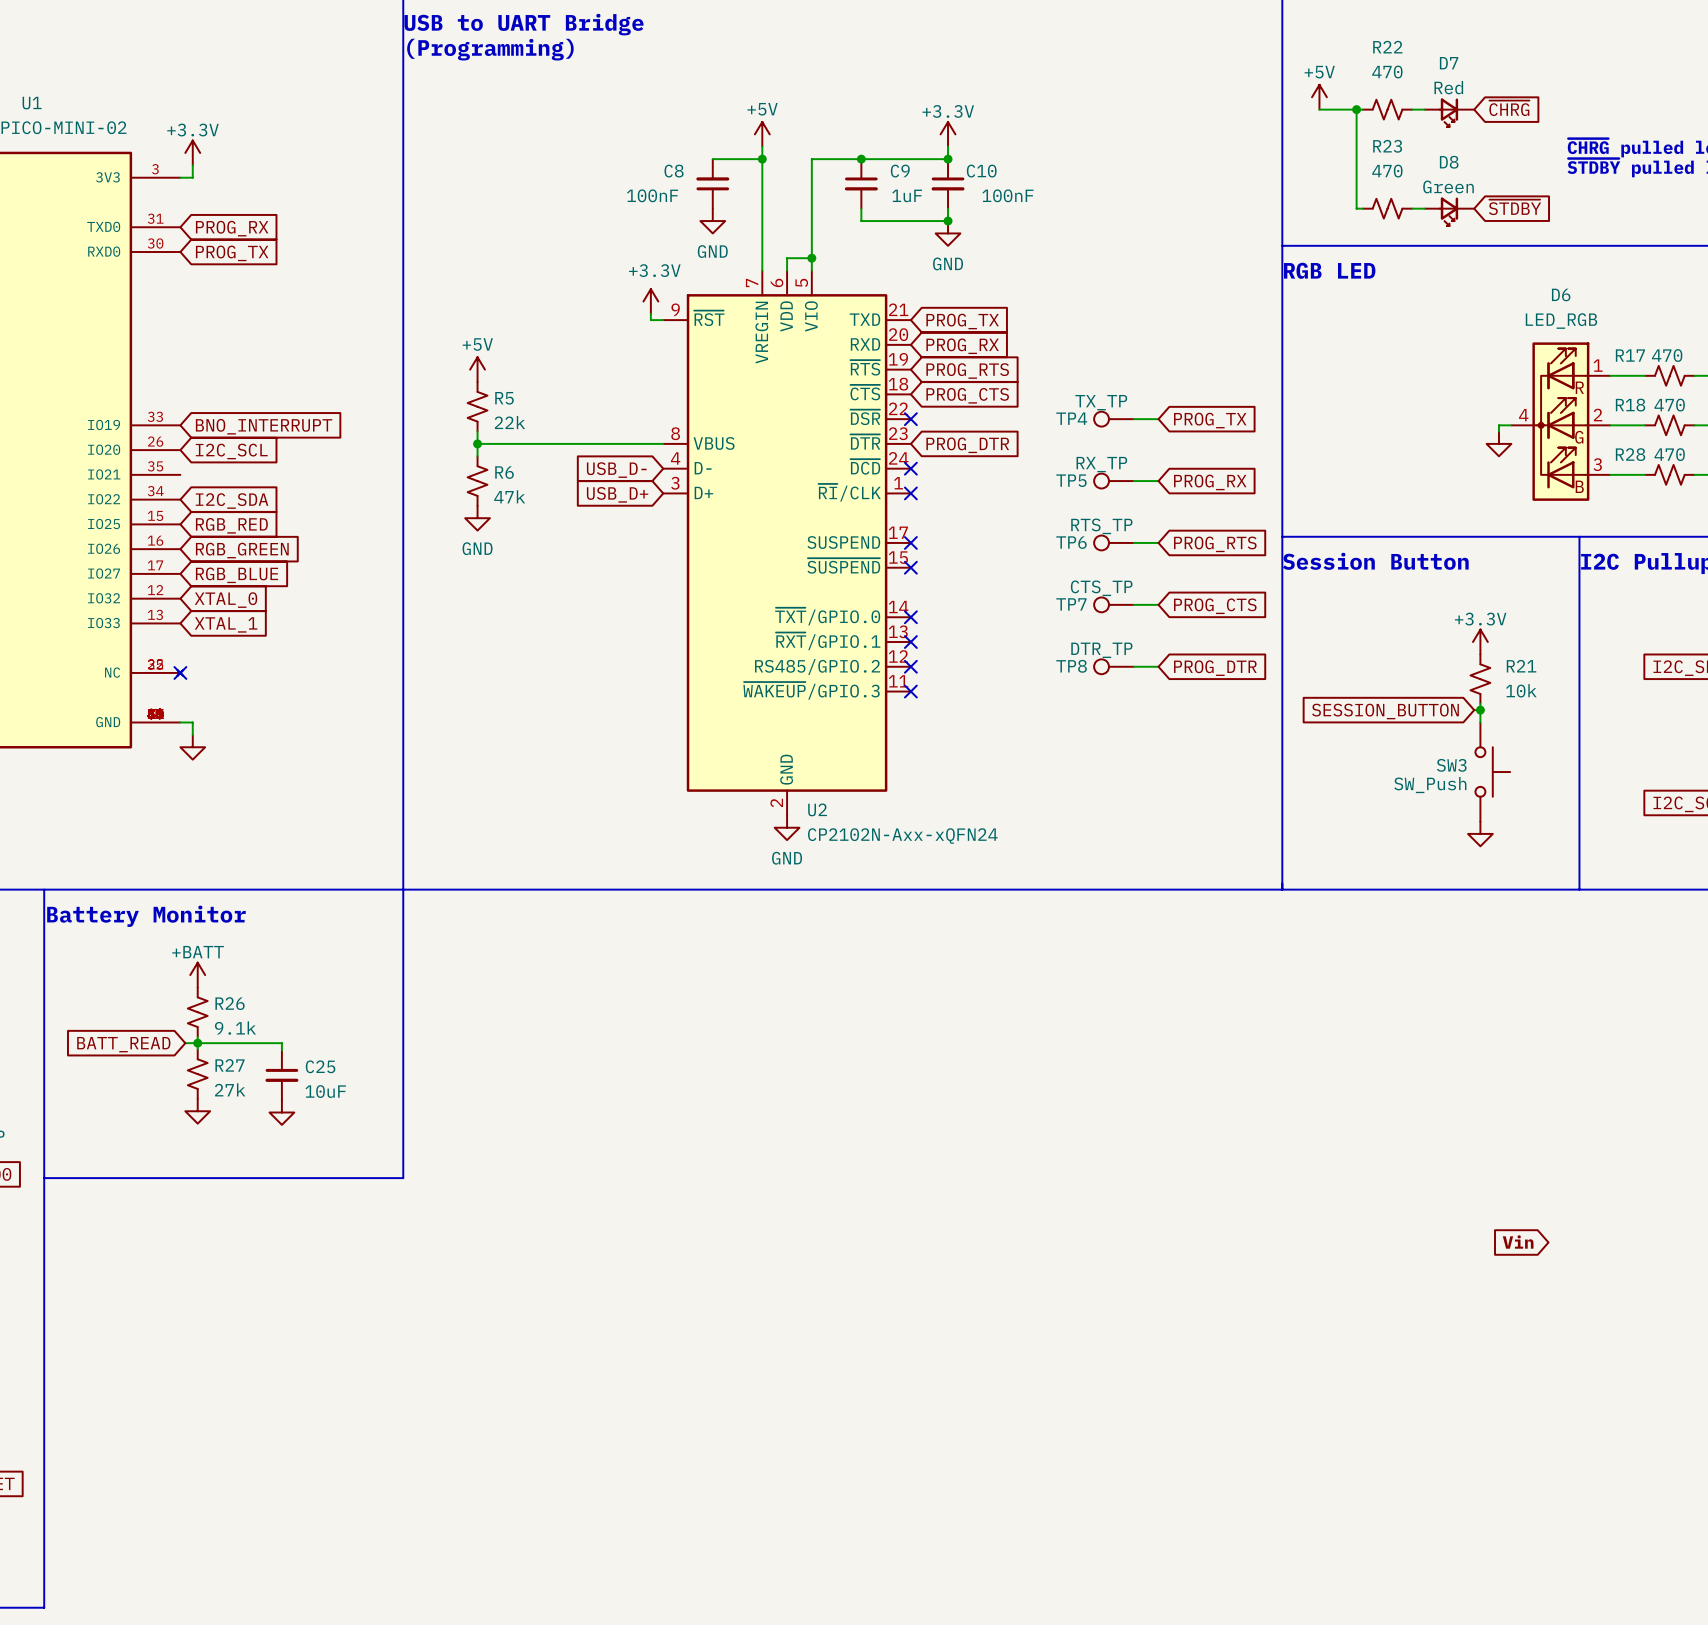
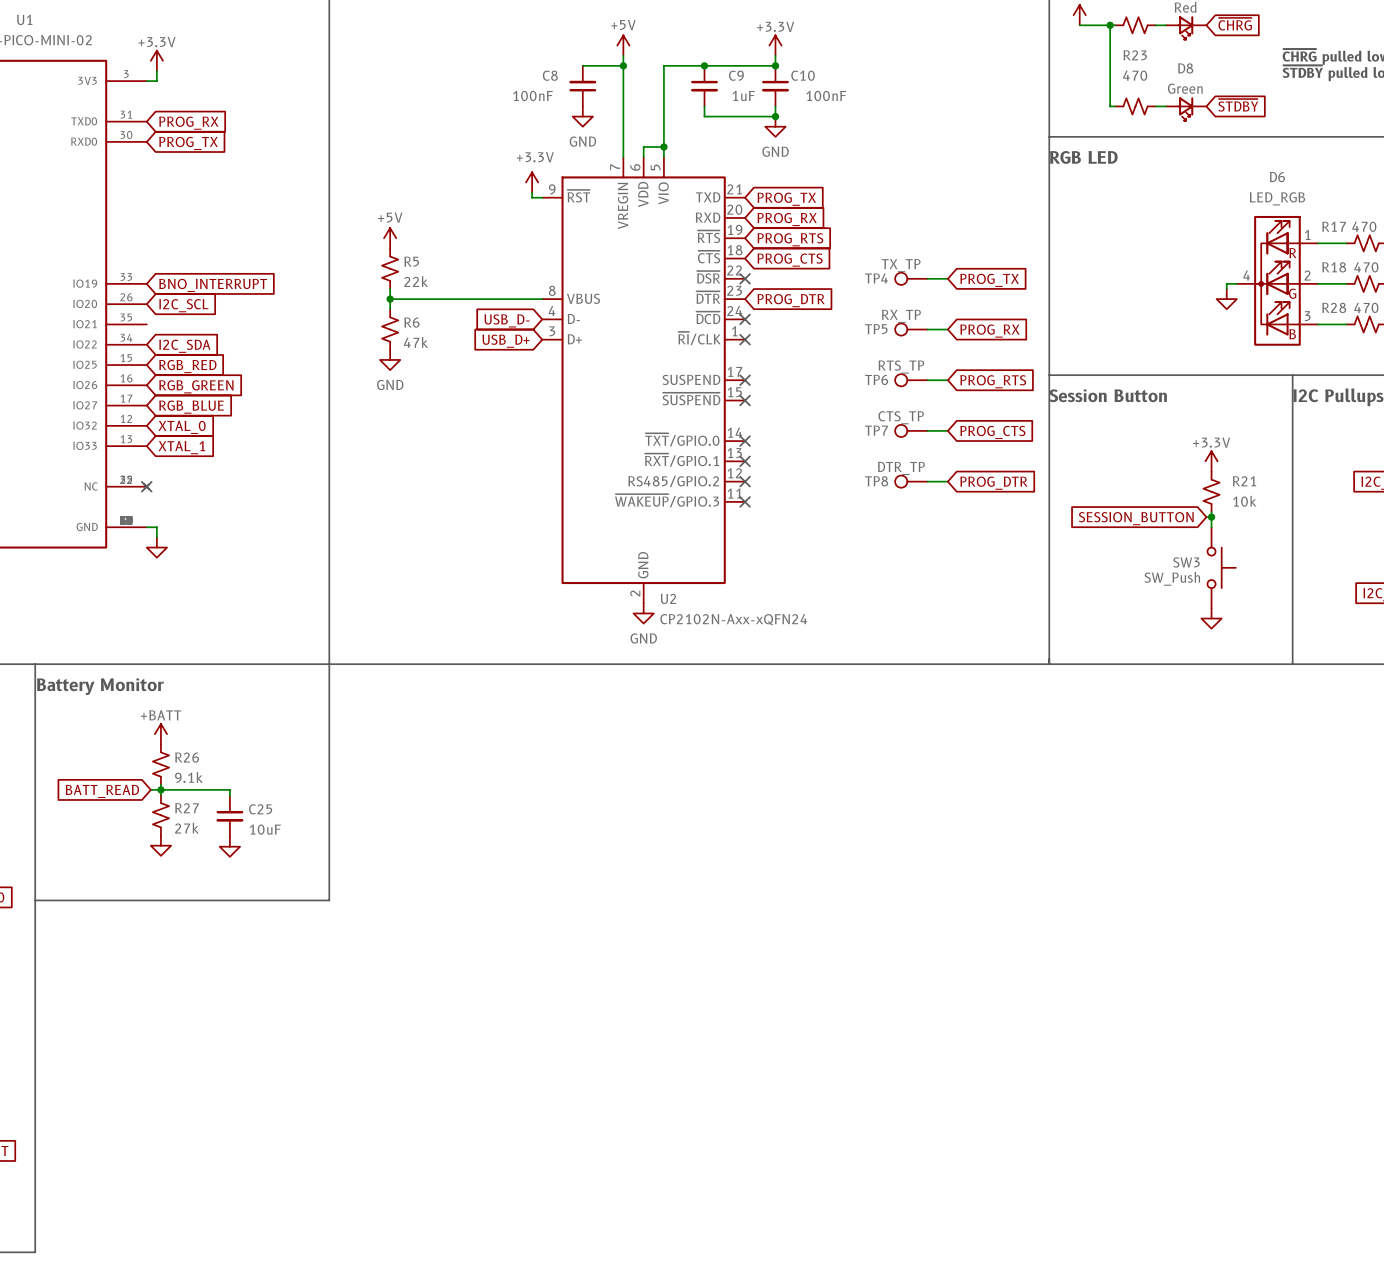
global label: Vin (1518, 1242) -> none

